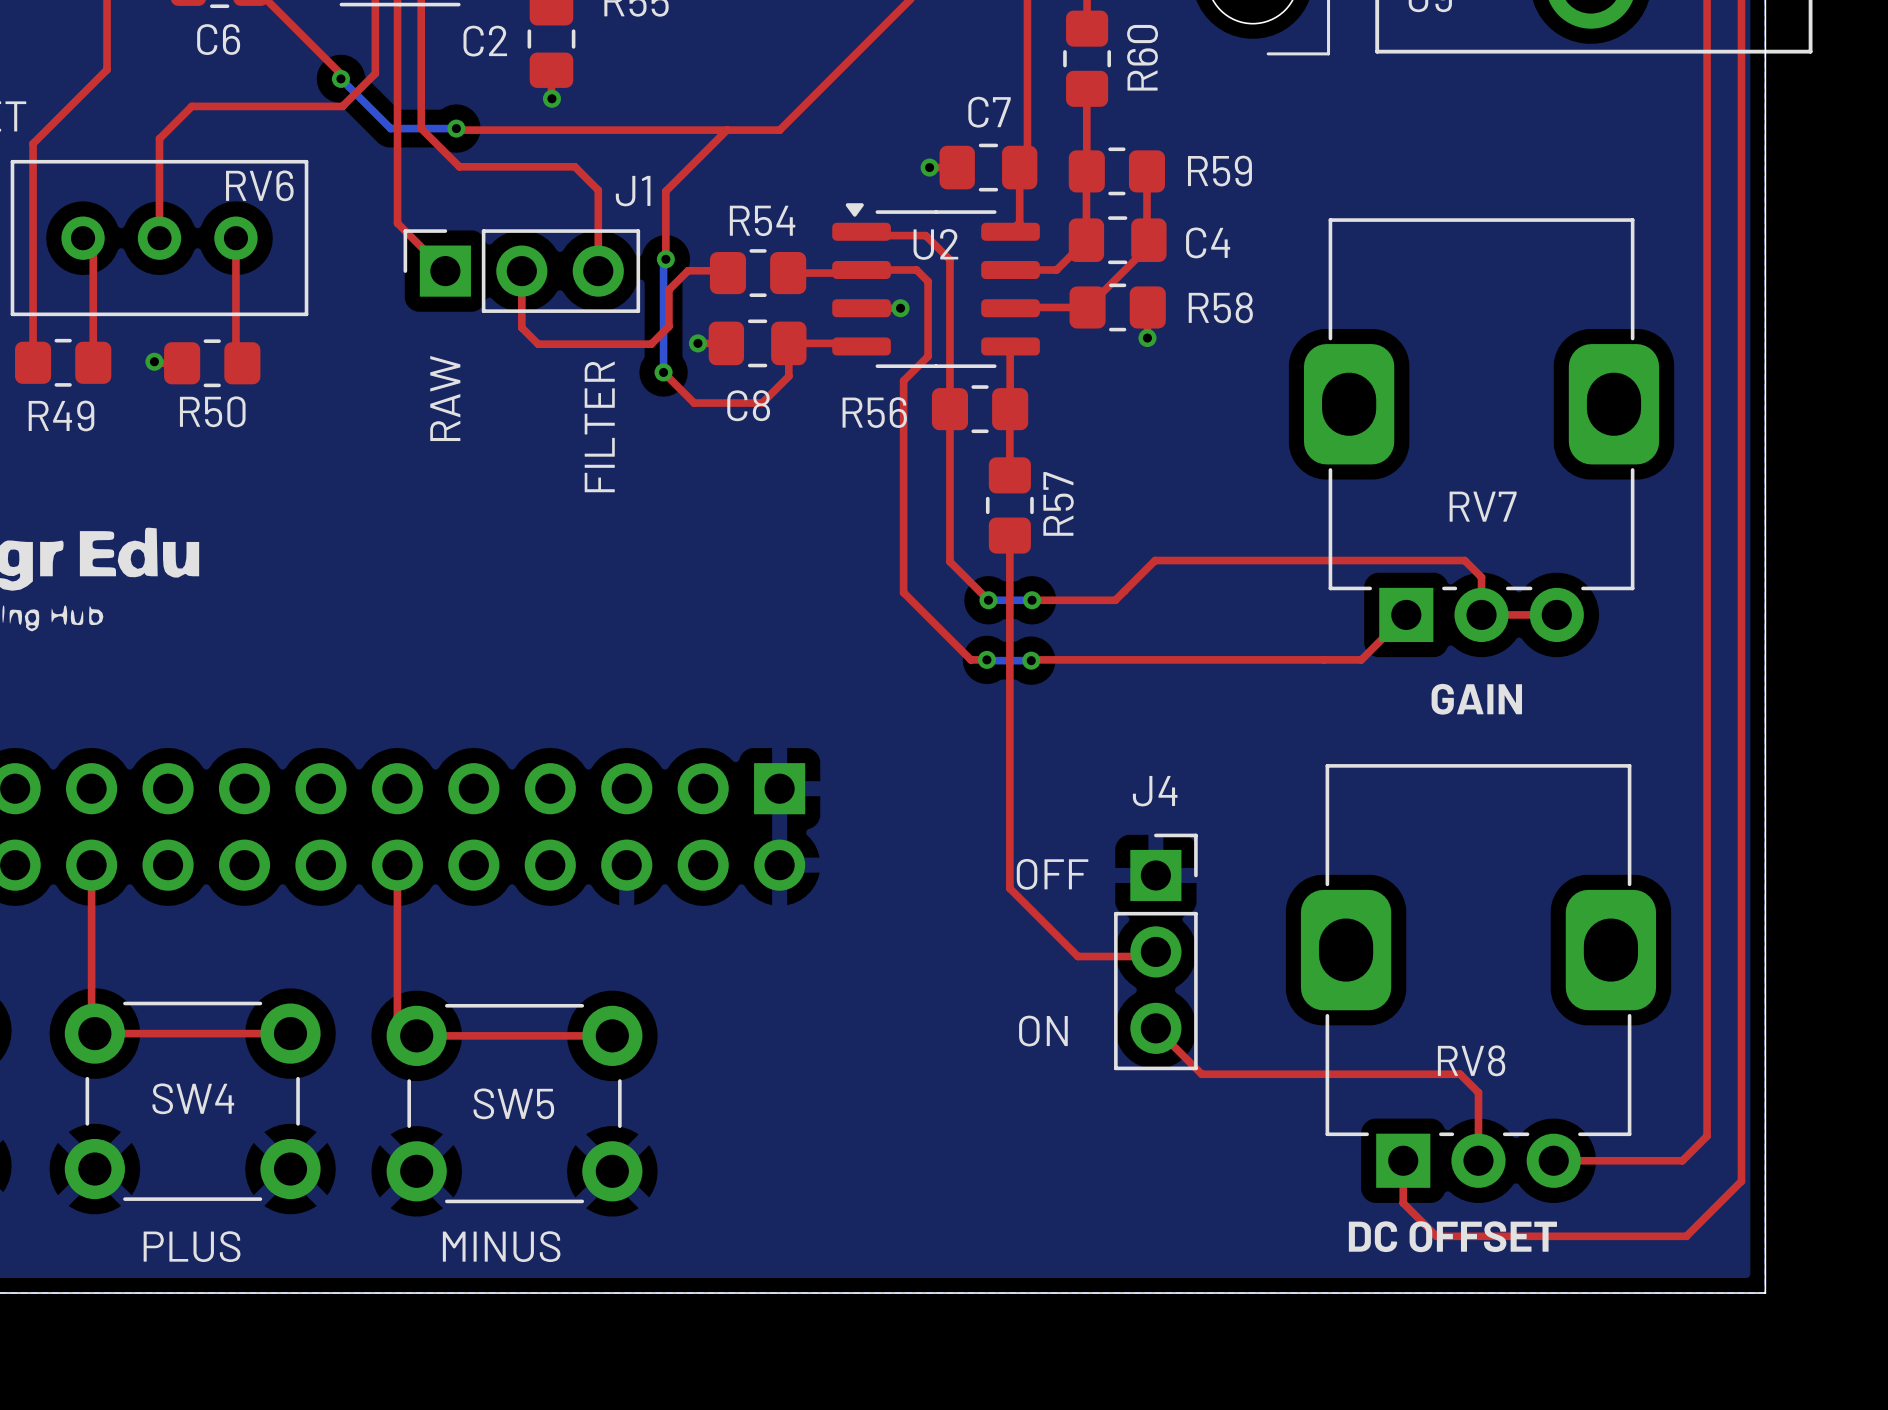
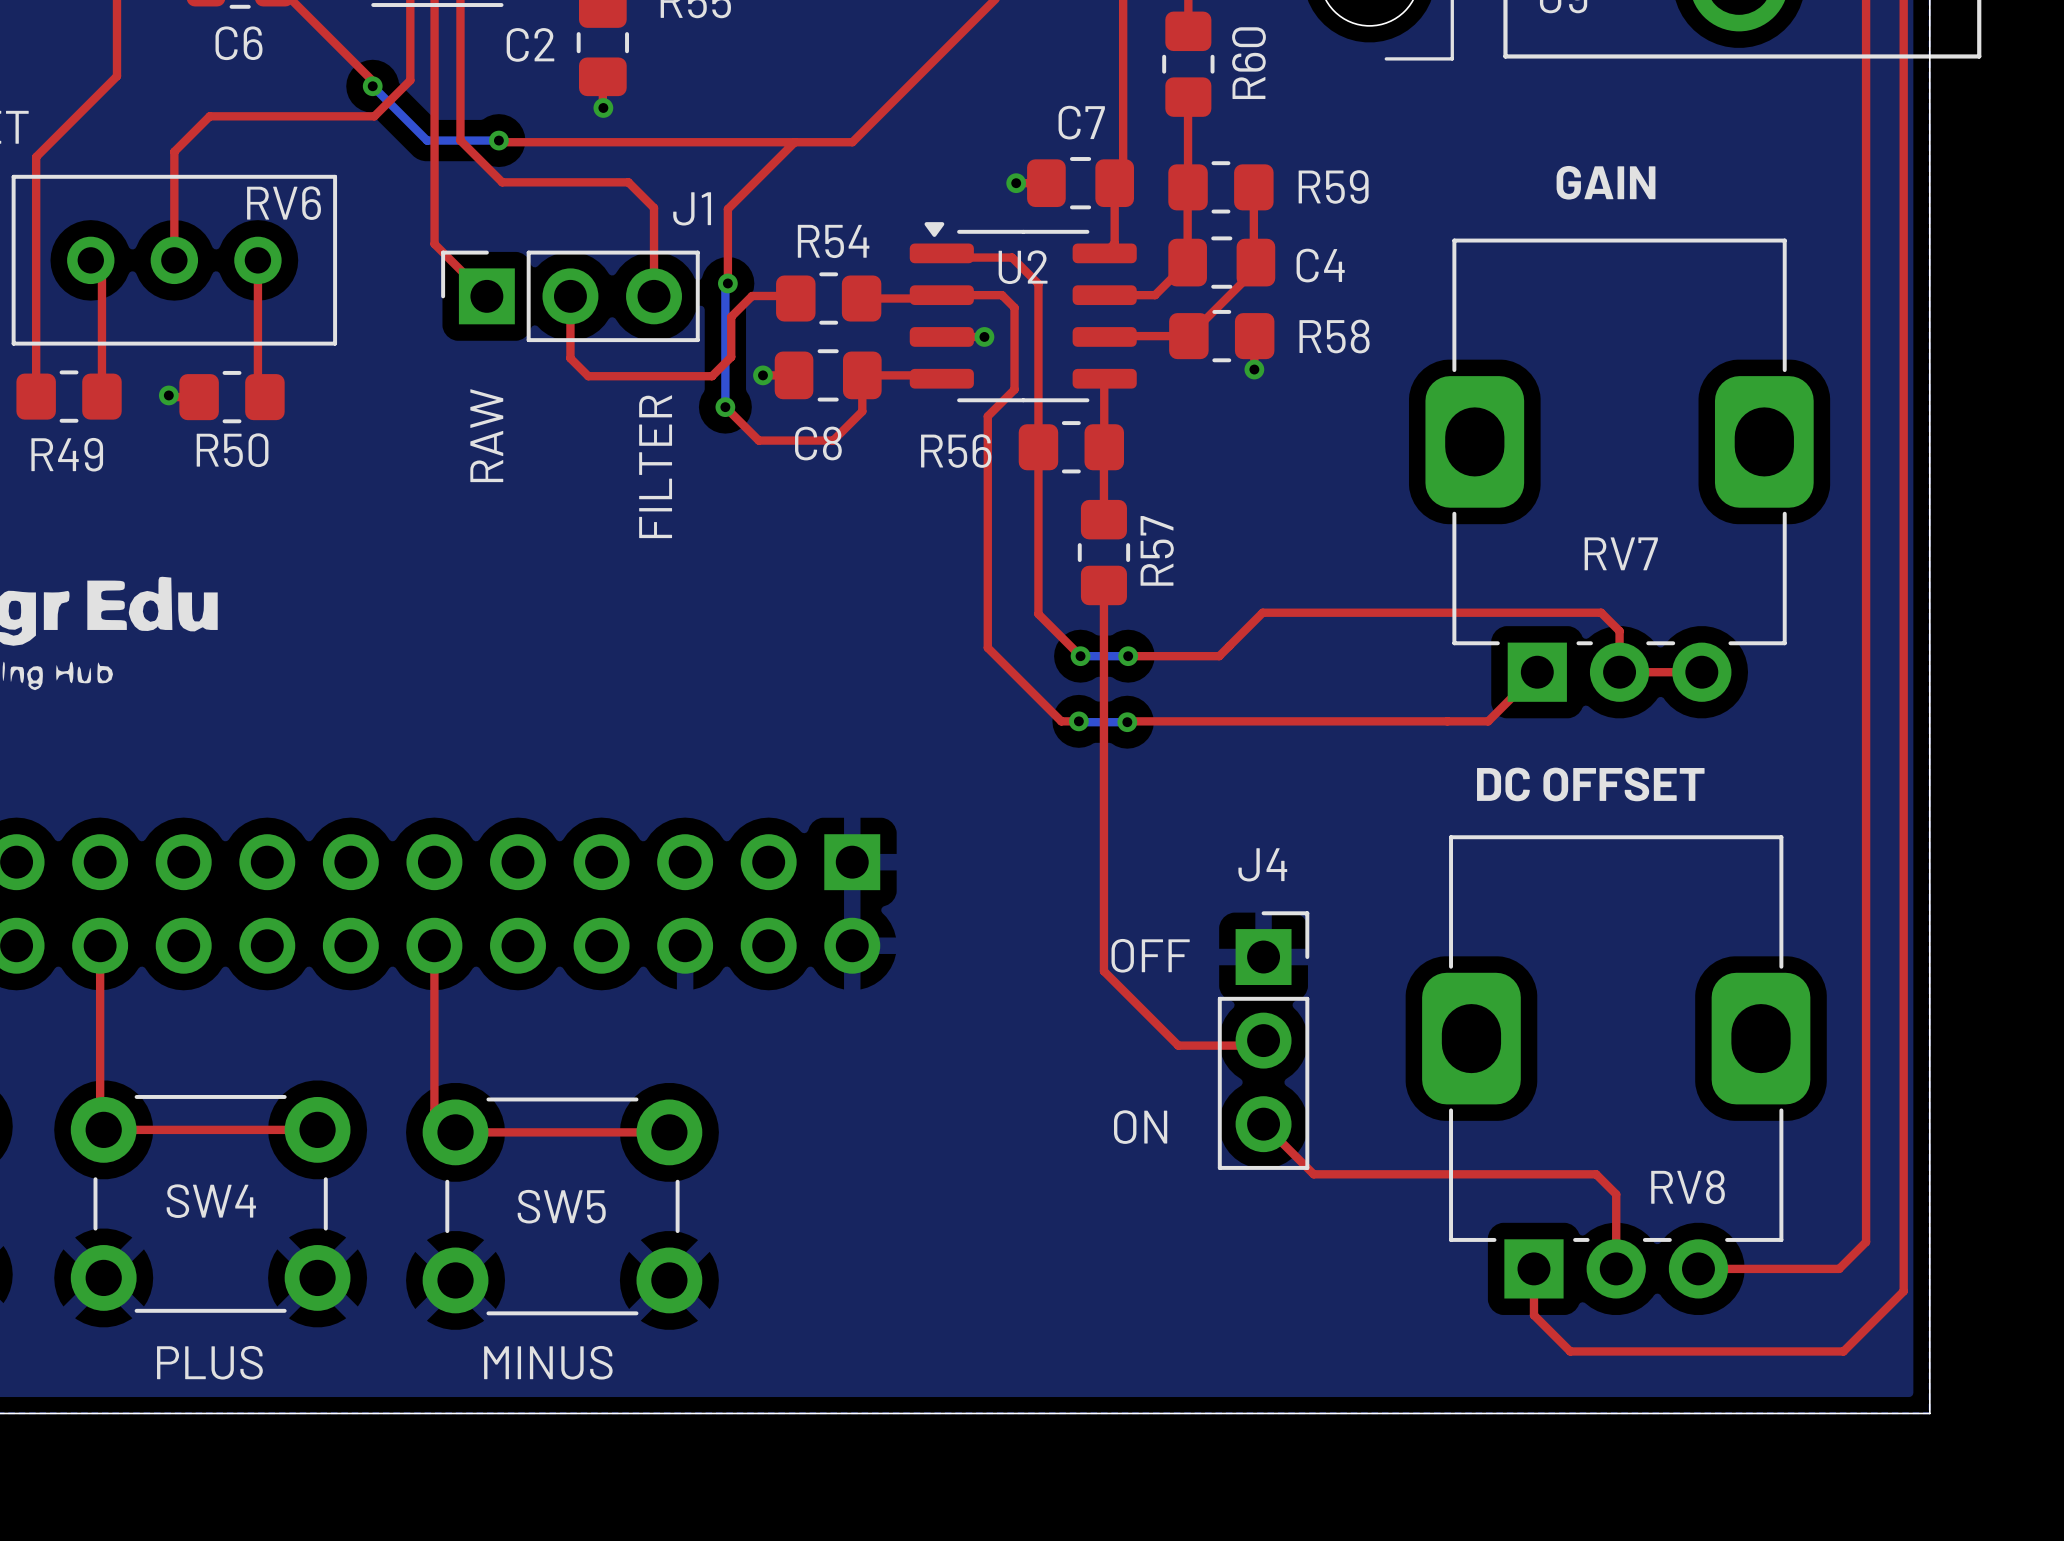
text position: GAIN (1476, 699) -> GAIN (1606, 182)
RV8 name position: RV8 (1471, 1060) -> RV8 (1688, 1187)
text position: DC OFFSET (1452, 1236) -> DC OFFSET (1590, 784)

